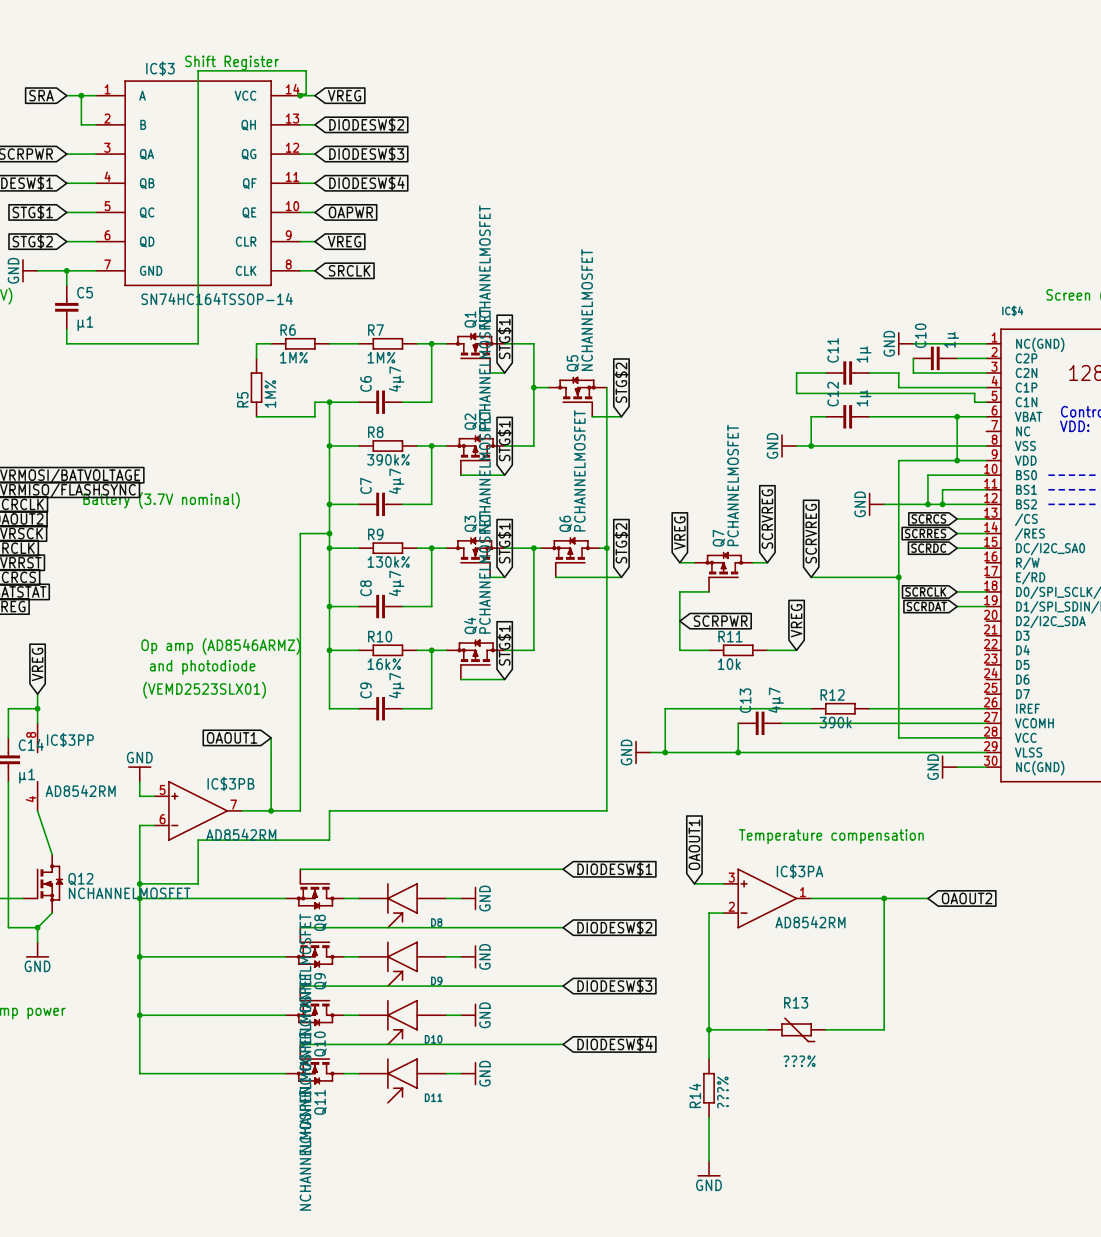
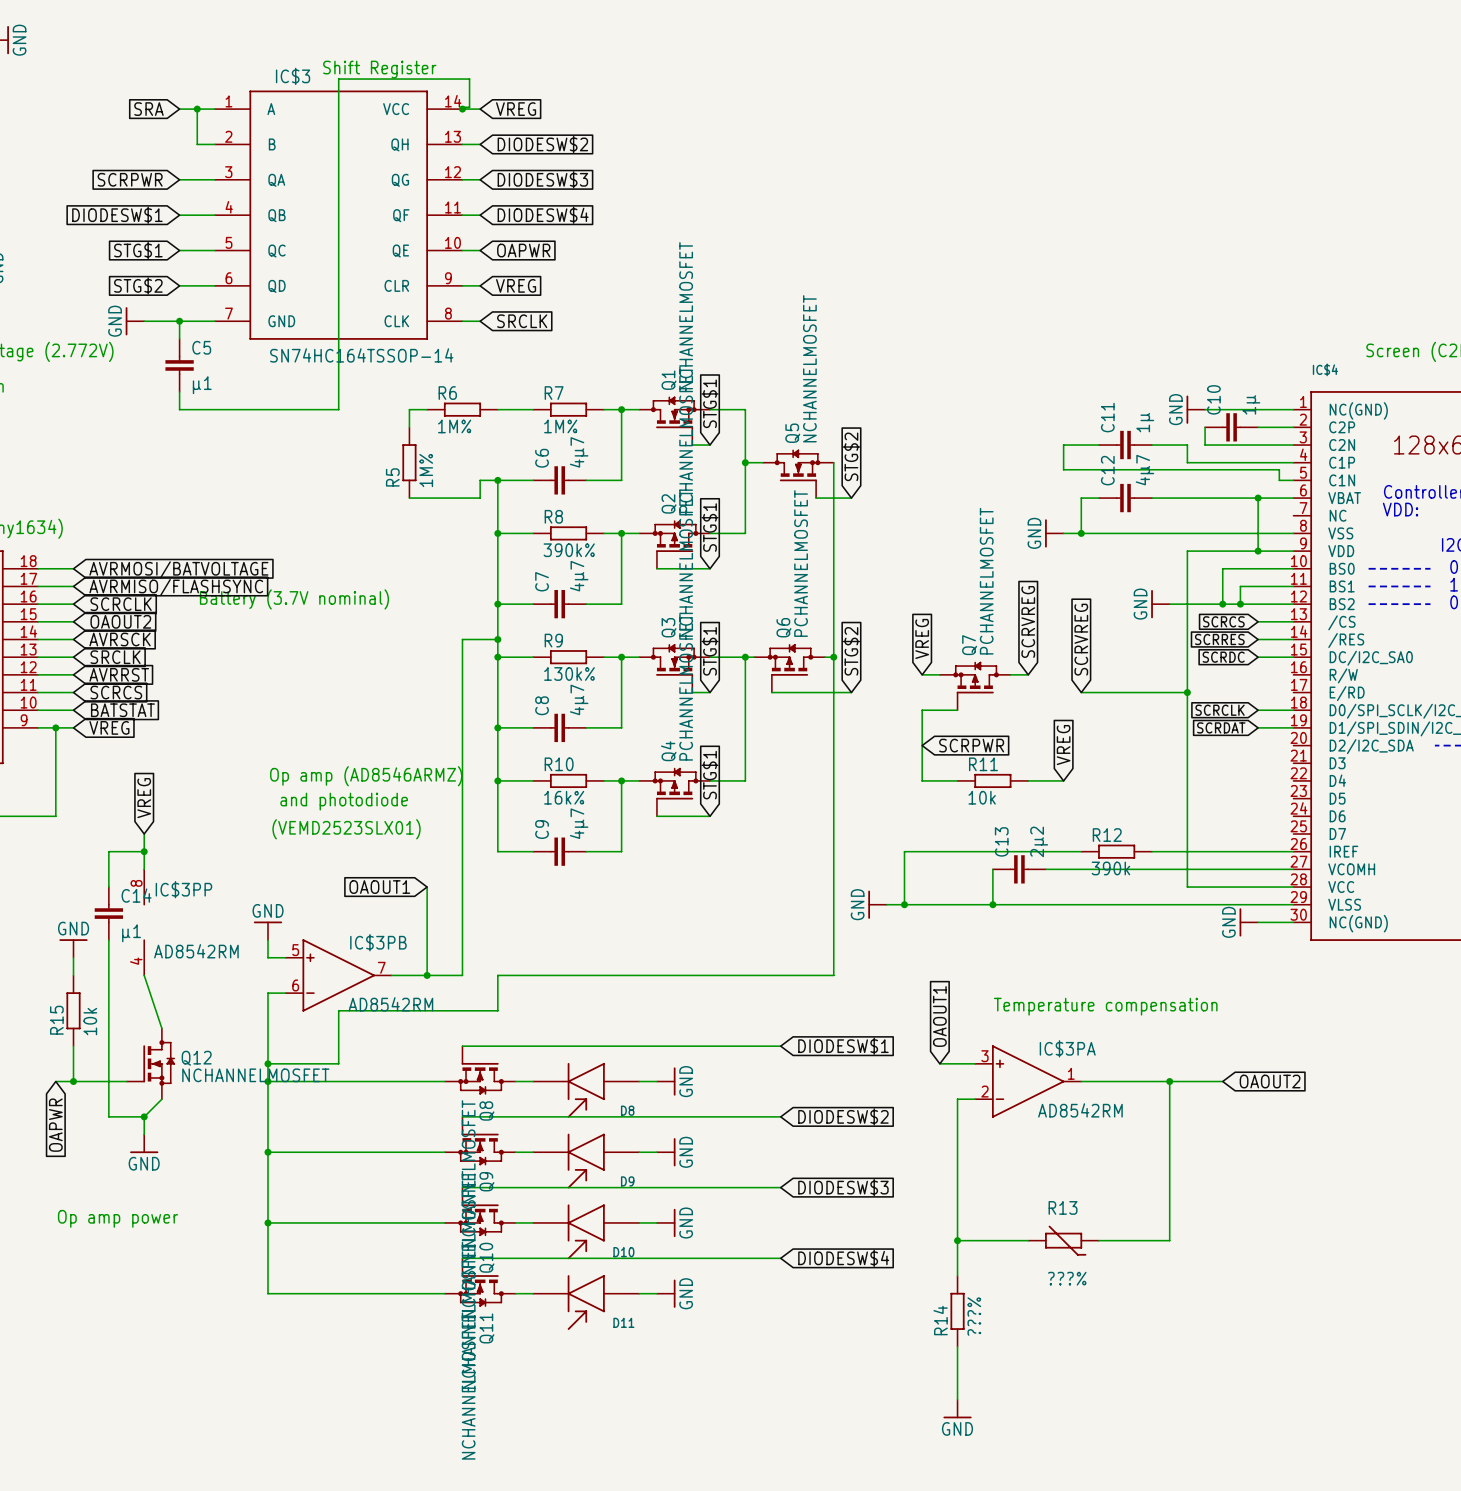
C12 value: 1µ (863, 398) -> 4µ7 (1144, 470)
C13 value: 4µ7 (776, 700) -> 2µ2 (1039, 841)

